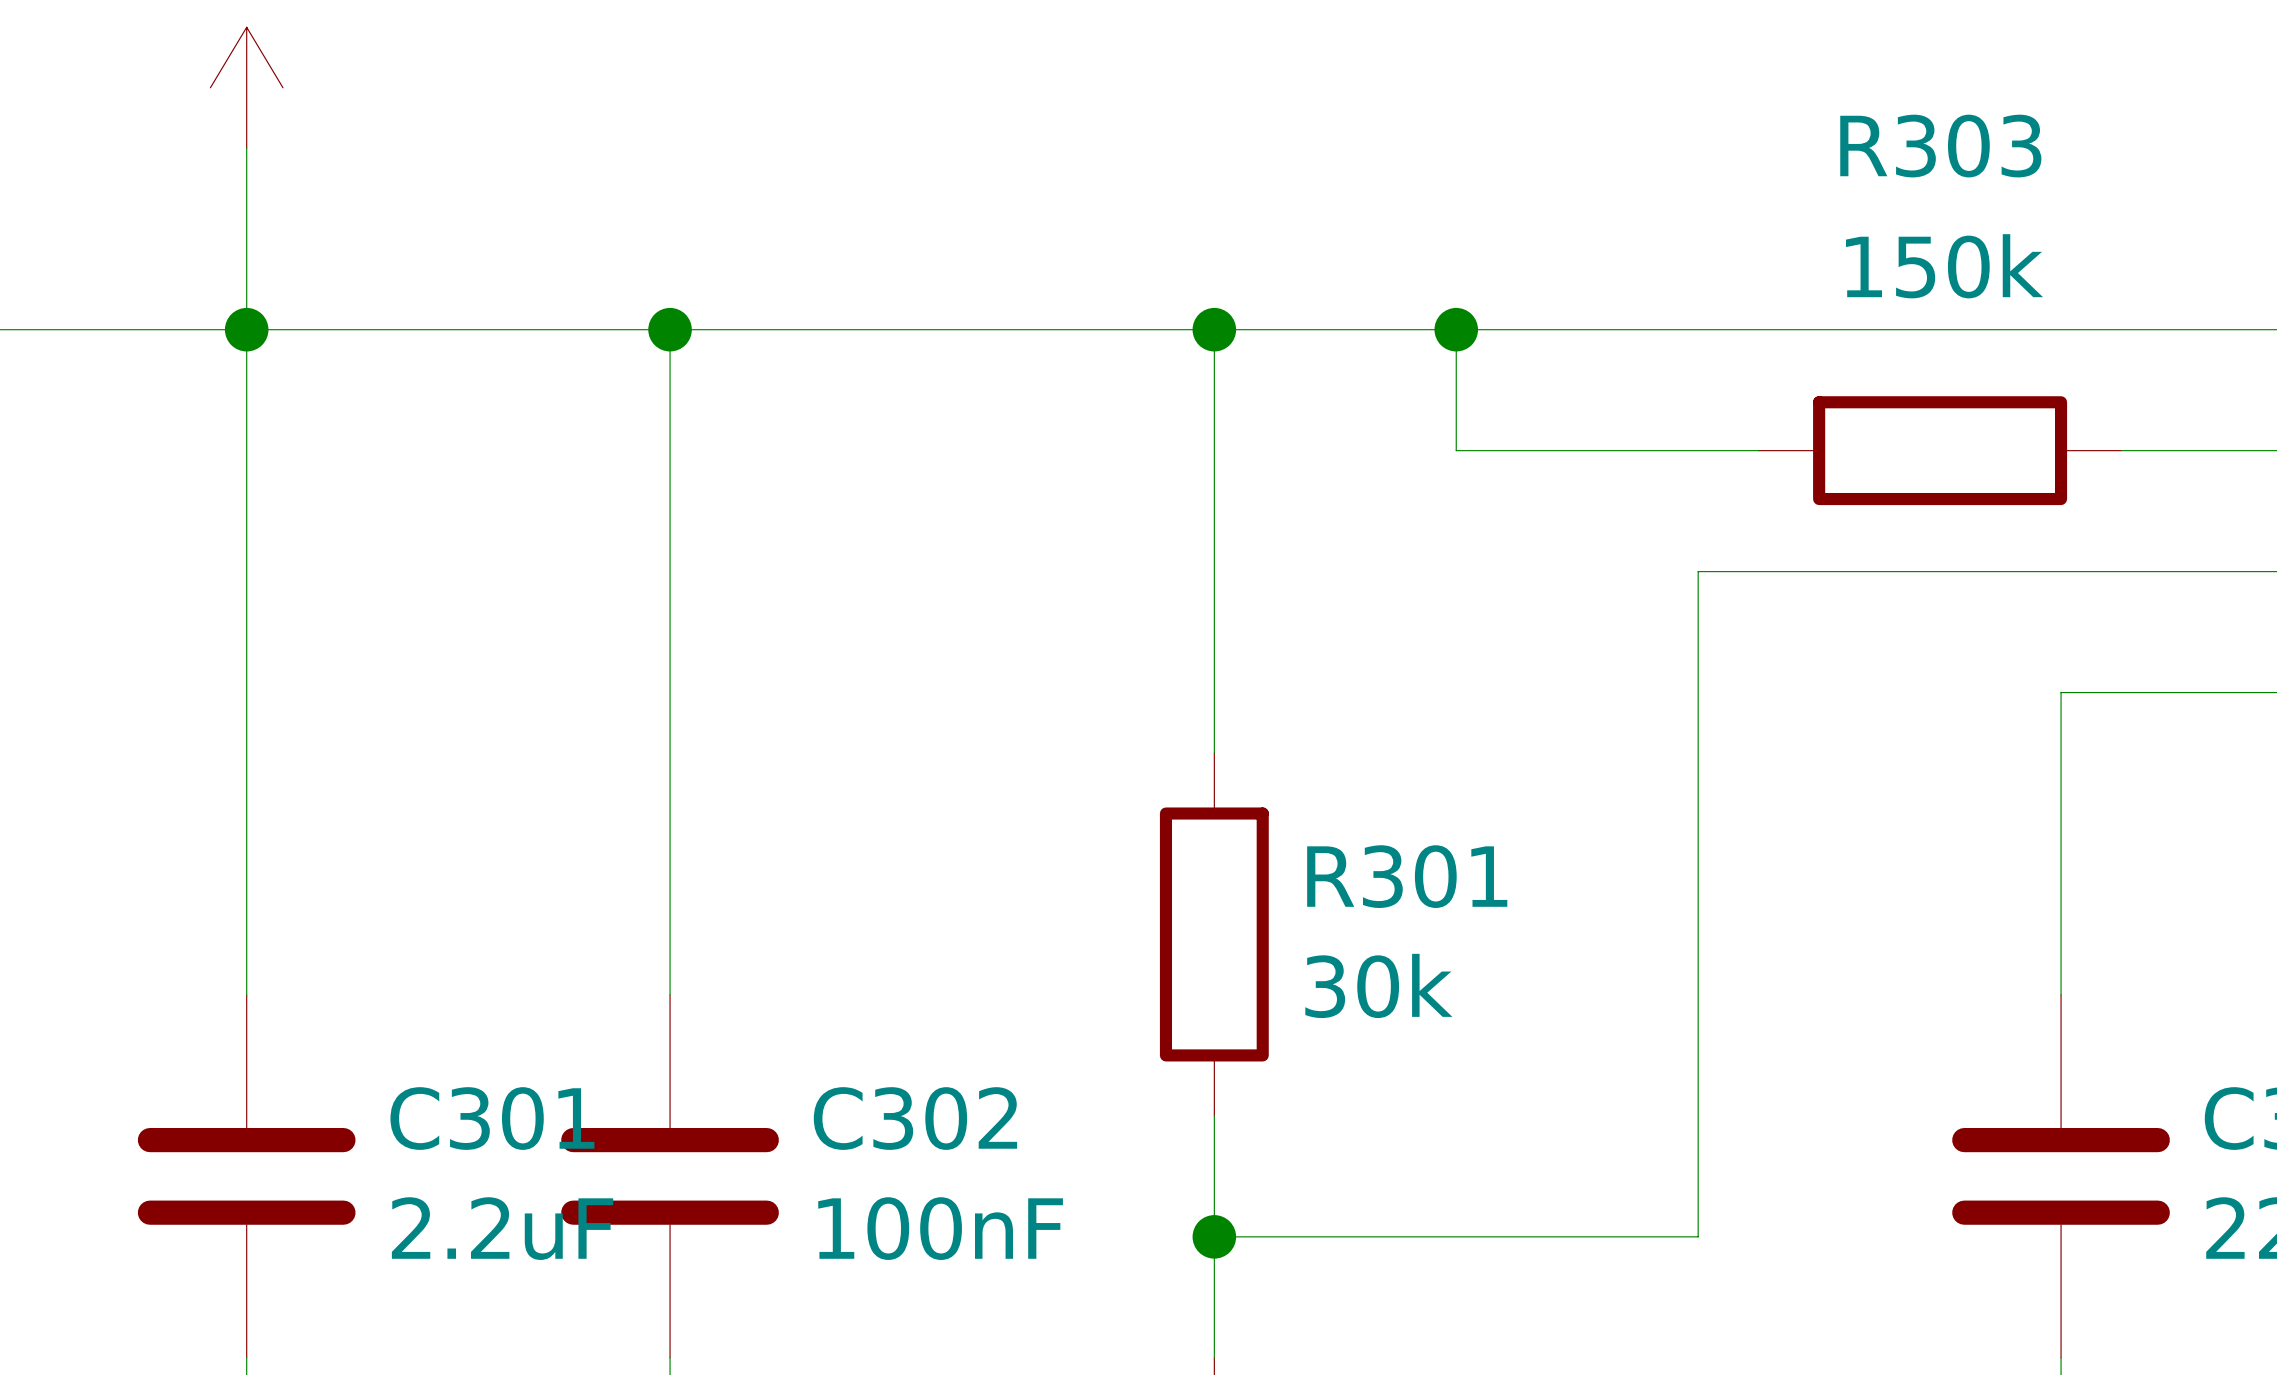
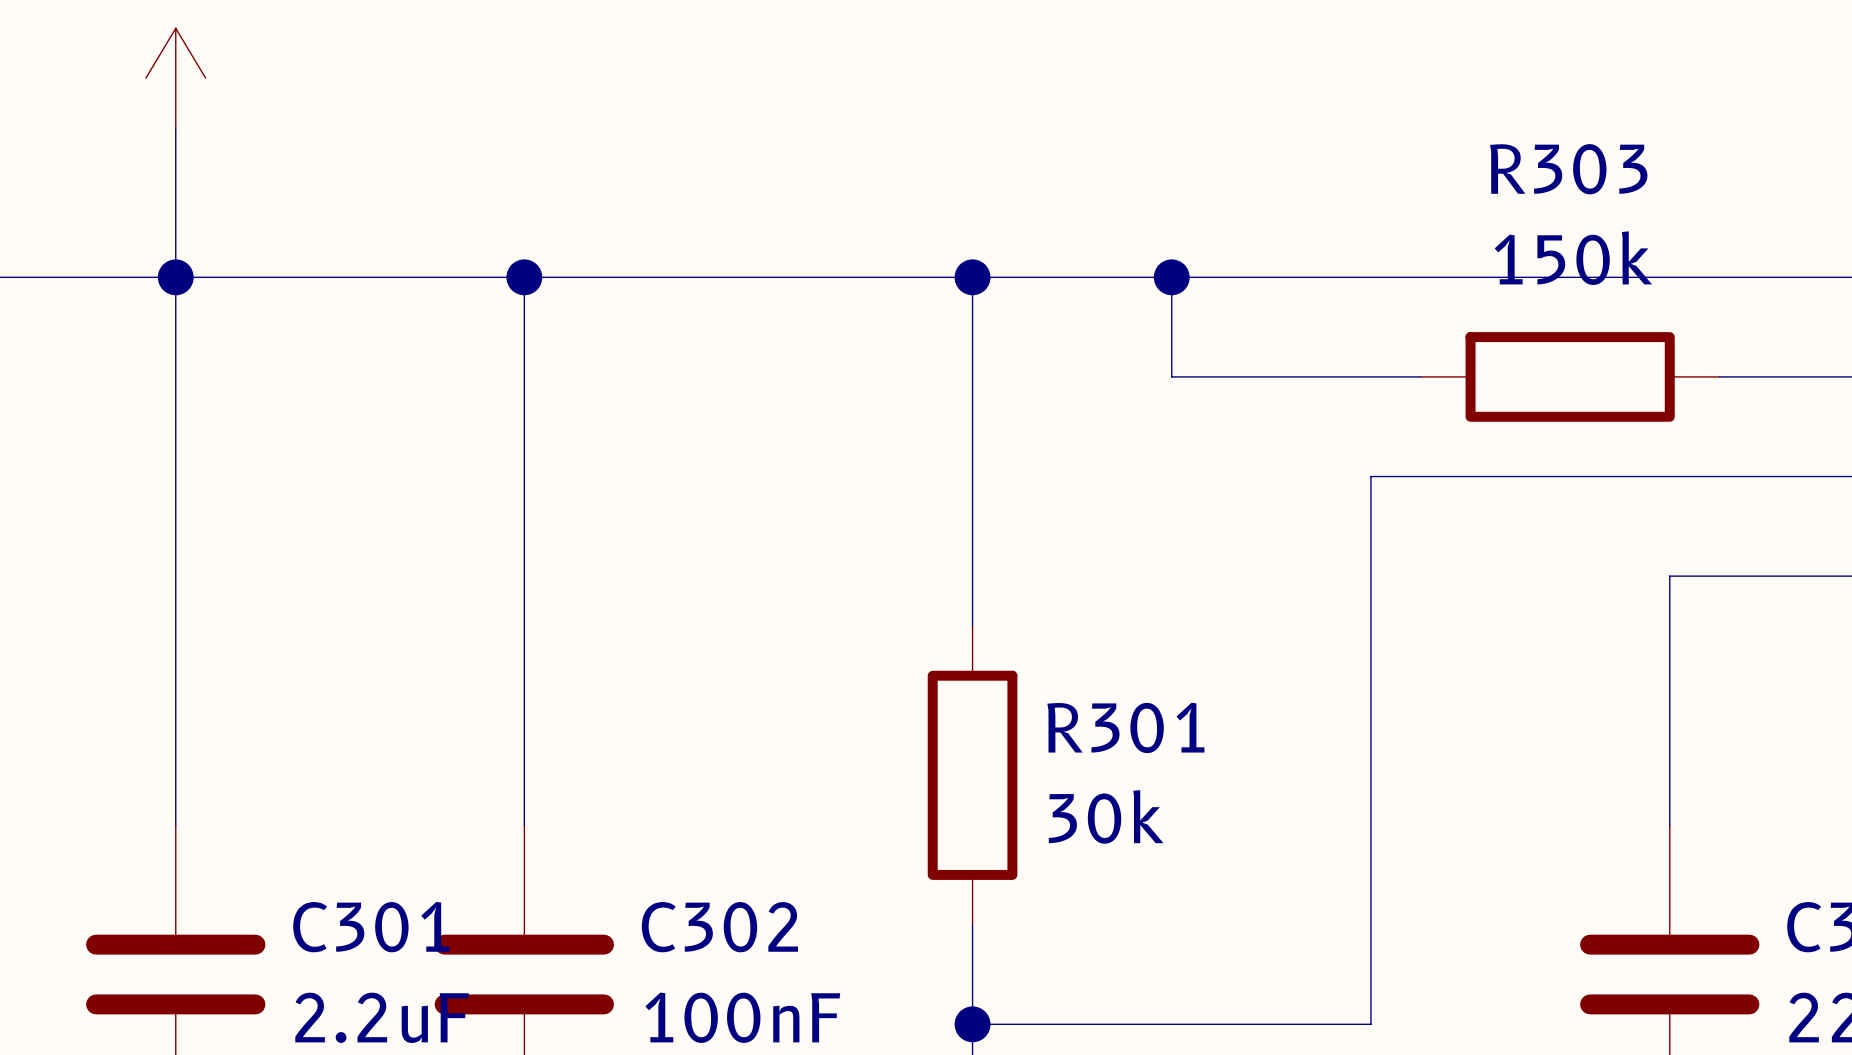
R303 name position: R303 (1940, 146) -> R303 (1568, 169)
R303 value position: 150k (1944, 266) -> 150k (1573, 258)

